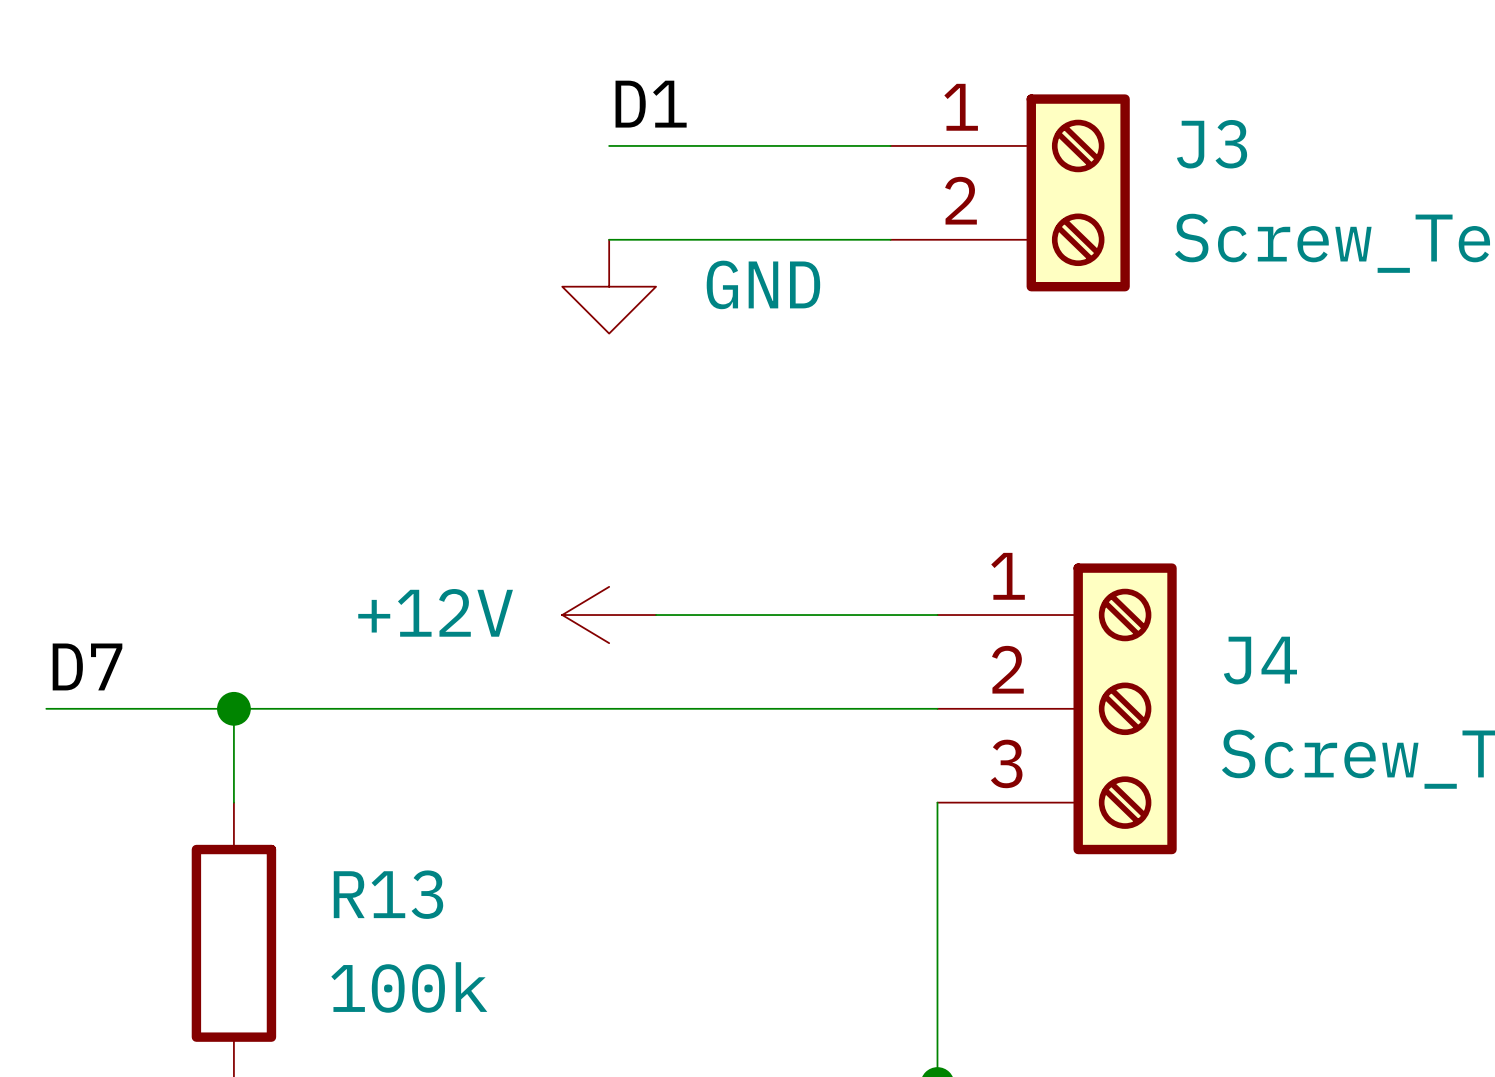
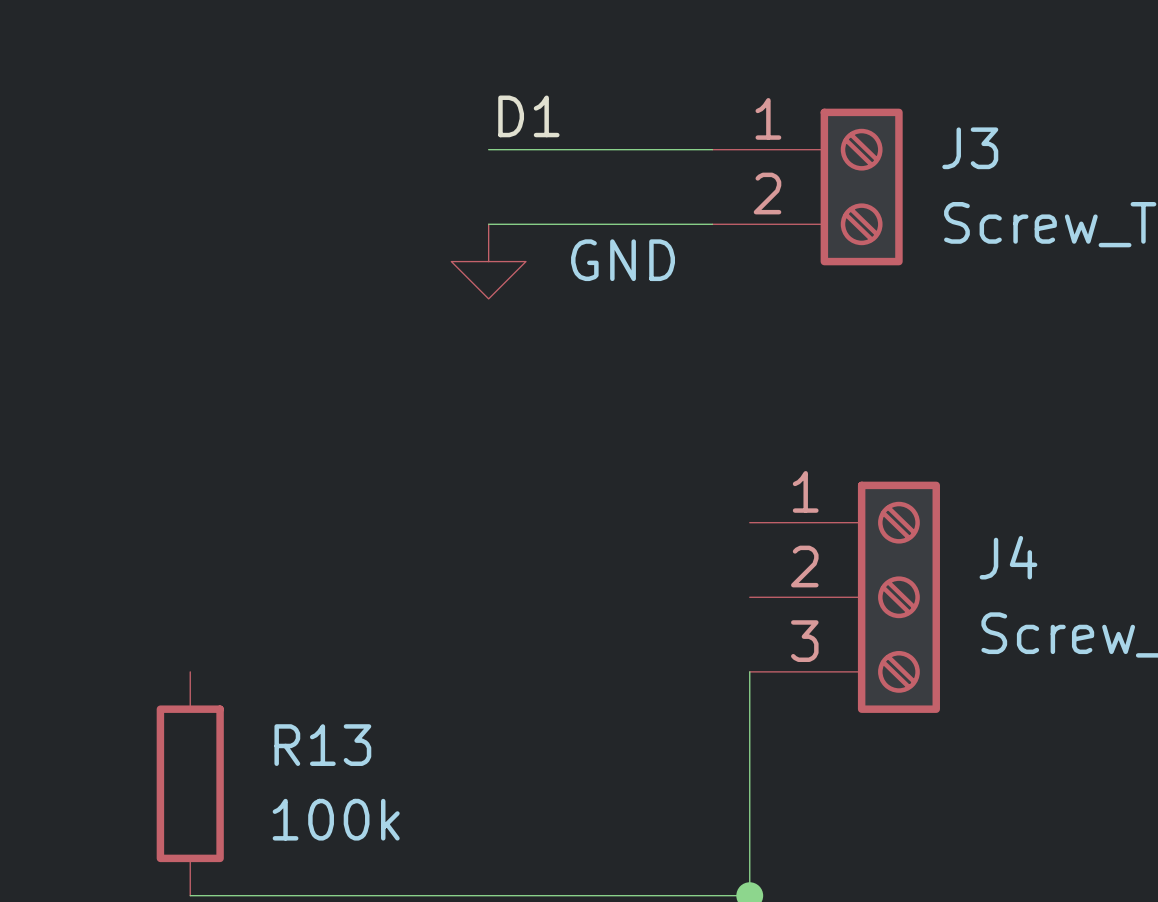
power symbol: +12V (609, 615) -> none
wire: (656, 615) (937, 615) -> none
label: D7 (87, 666) -> none
wire: (46, 708) (937, 708) -> none
wire: (233, 708) (233, 802) -> none
junction: (233, 708) -> none

